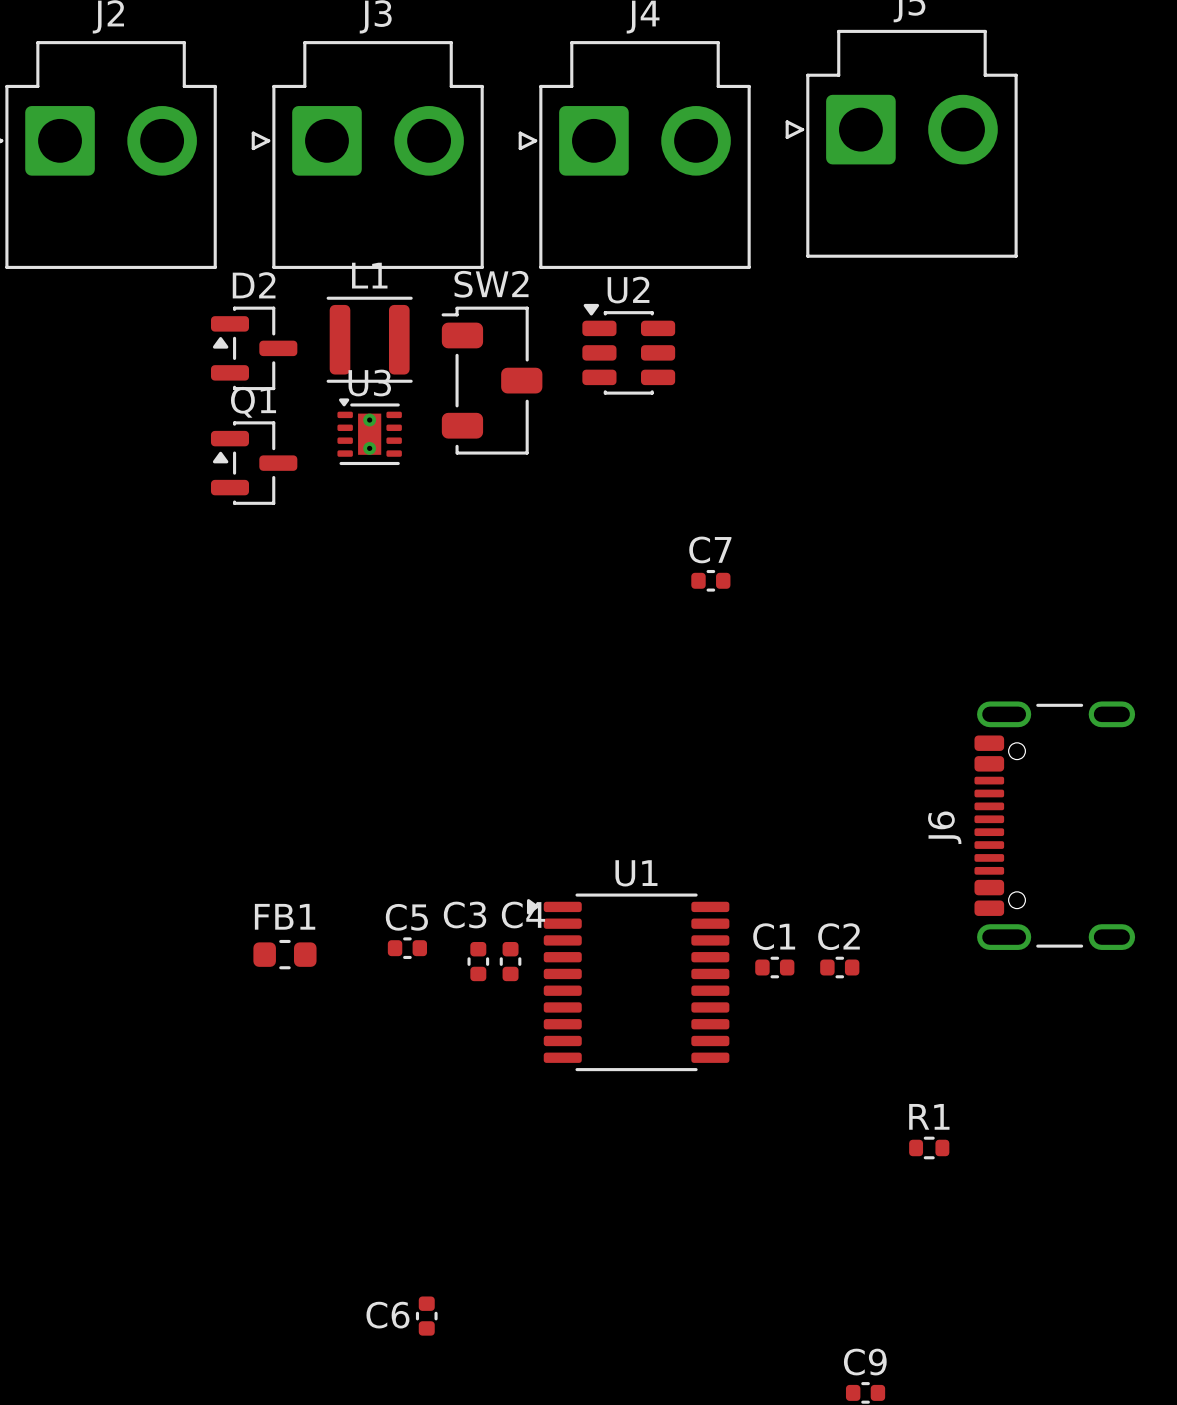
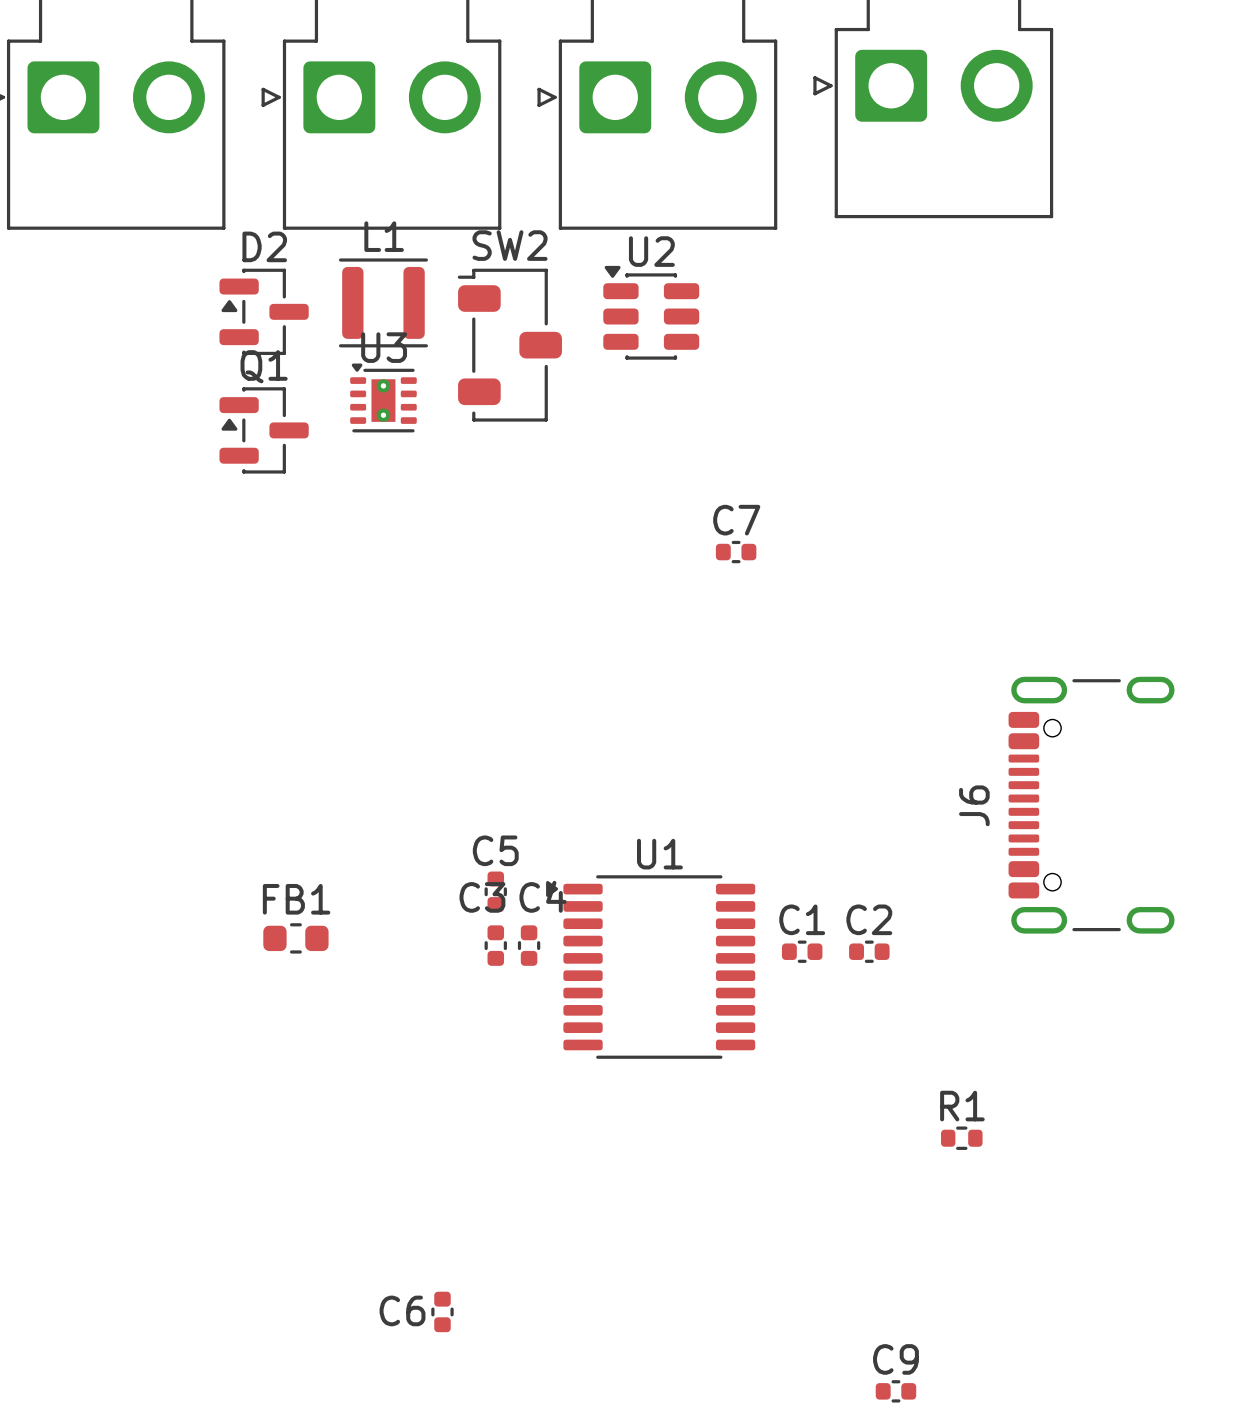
C5 rotation: 0° (407, 948) -> 90° clockwise (495, 891)
C5 position: (407, 948) -> (495, 891)

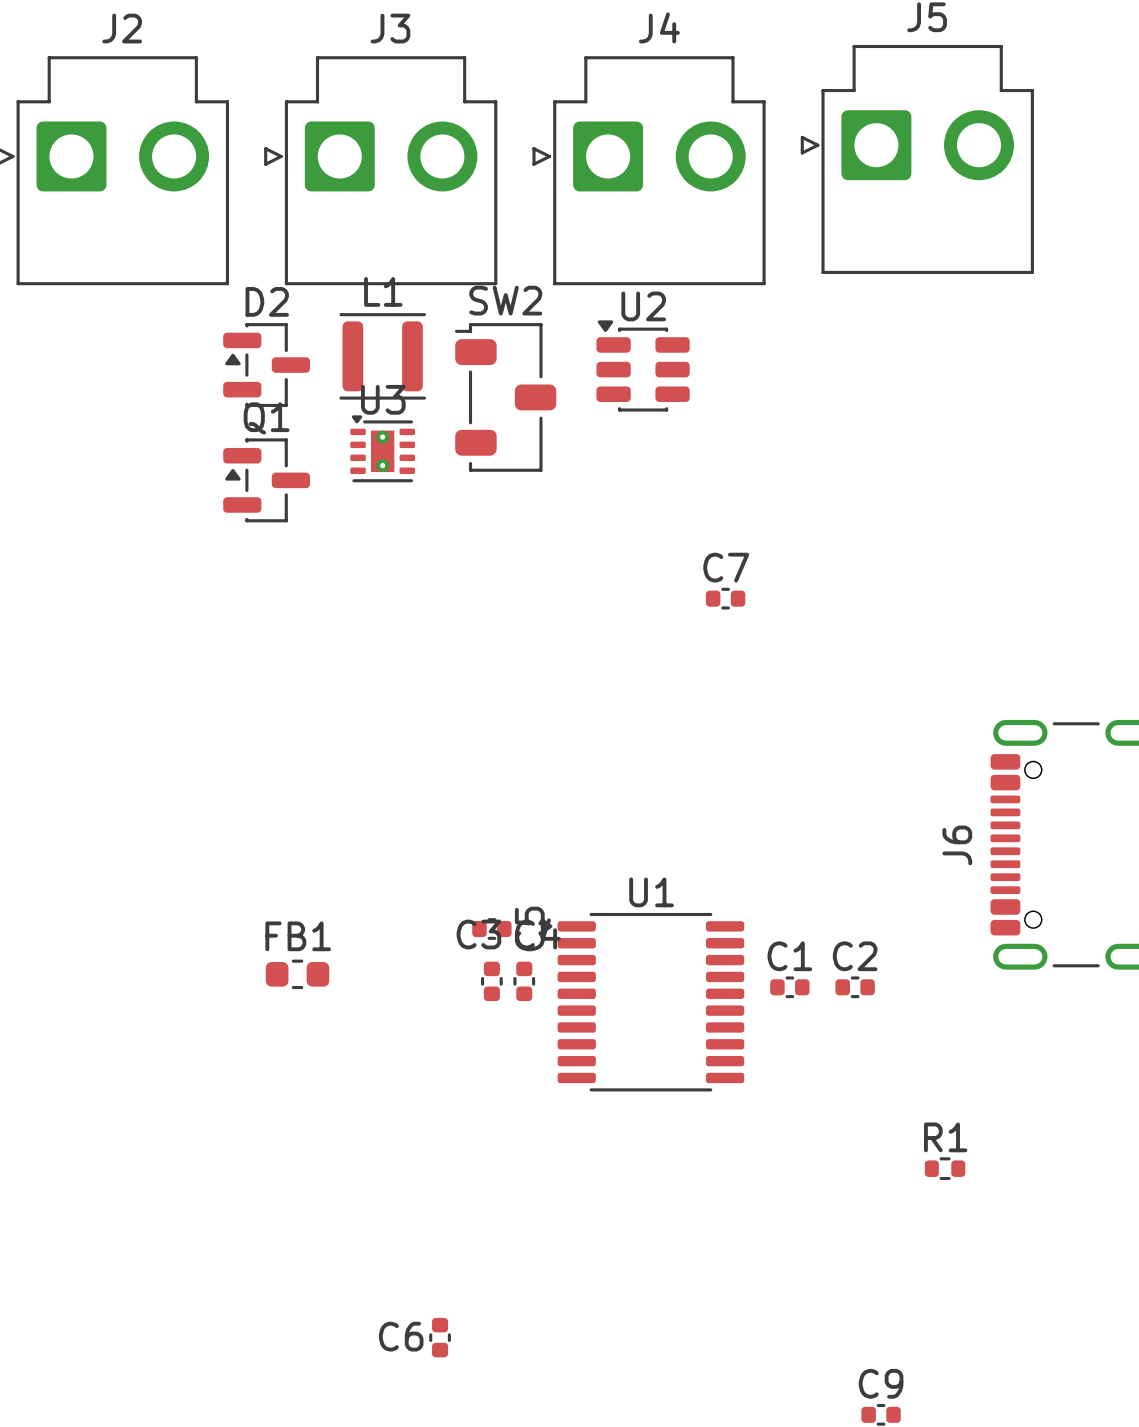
C5 rotation: 0° (495, 891) -> 90° clockwise (491, 928)

